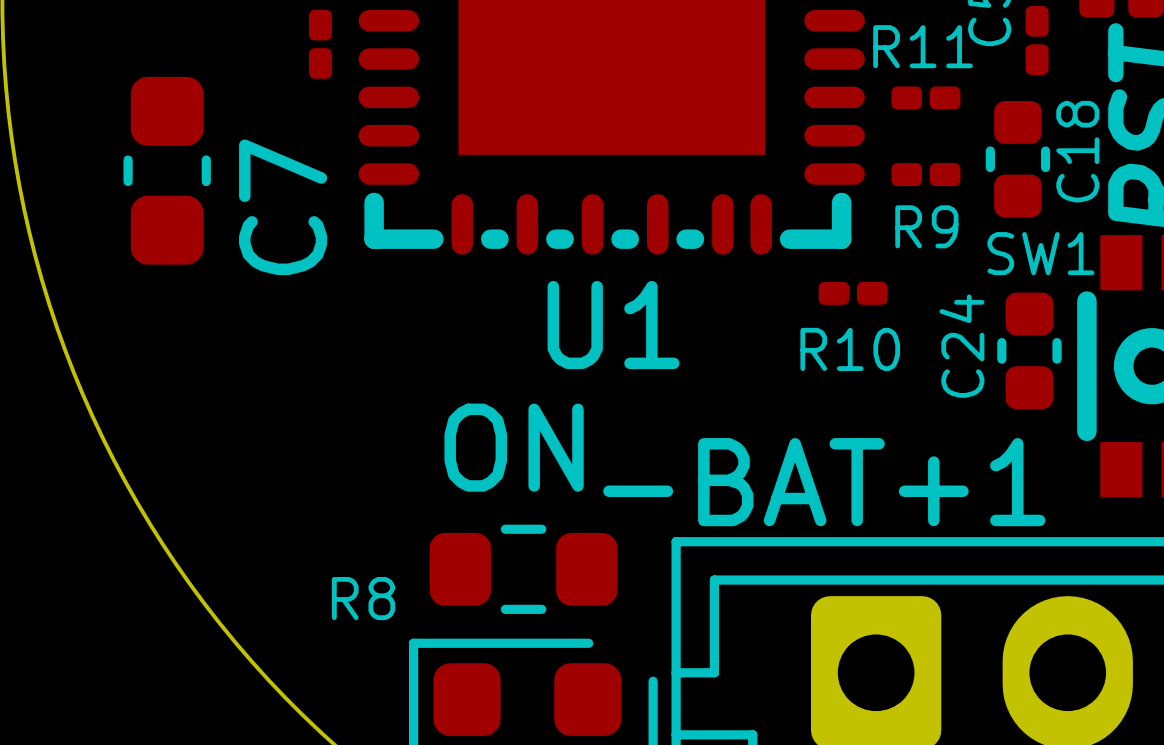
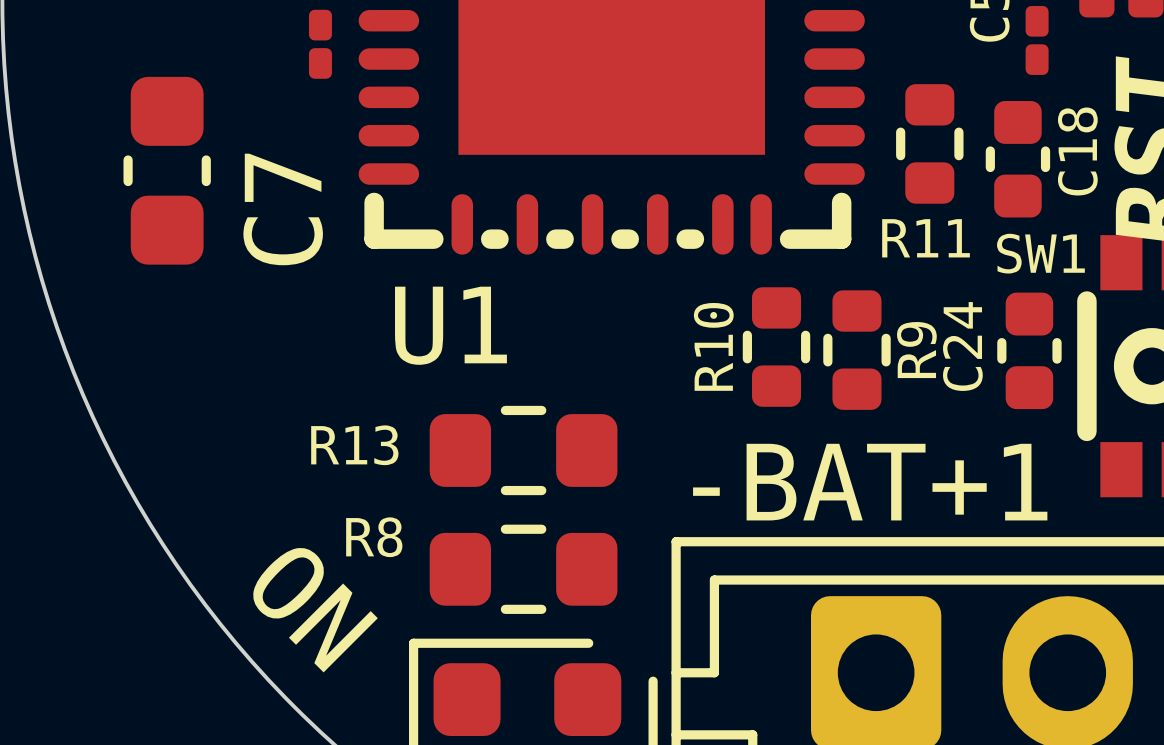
R11 footprint: [891, 86, 961, 110] -> [896, 84, 964, 204]
R9 footprint: [891, 163, 961, 187] -> [823, 290, 891, 410]
R10 footprint: [818, 281, 888, 305] -> [742, 287, 811, 407]
U1 name position: U1 (613, 325) -> U1 (450, 325)
text rotation: 0° (514, 447) -> 45° clockwise (314, 609)
text position: ON (514, 447) -> ON (314, 609)
R13: none -> (523, 450)
-BAT+1 name position: -BAT+1 (824, 482) -> -BAT+1 (870, 482)
R8 name position: R8 (363, 598) -> R8 (374, 537)

